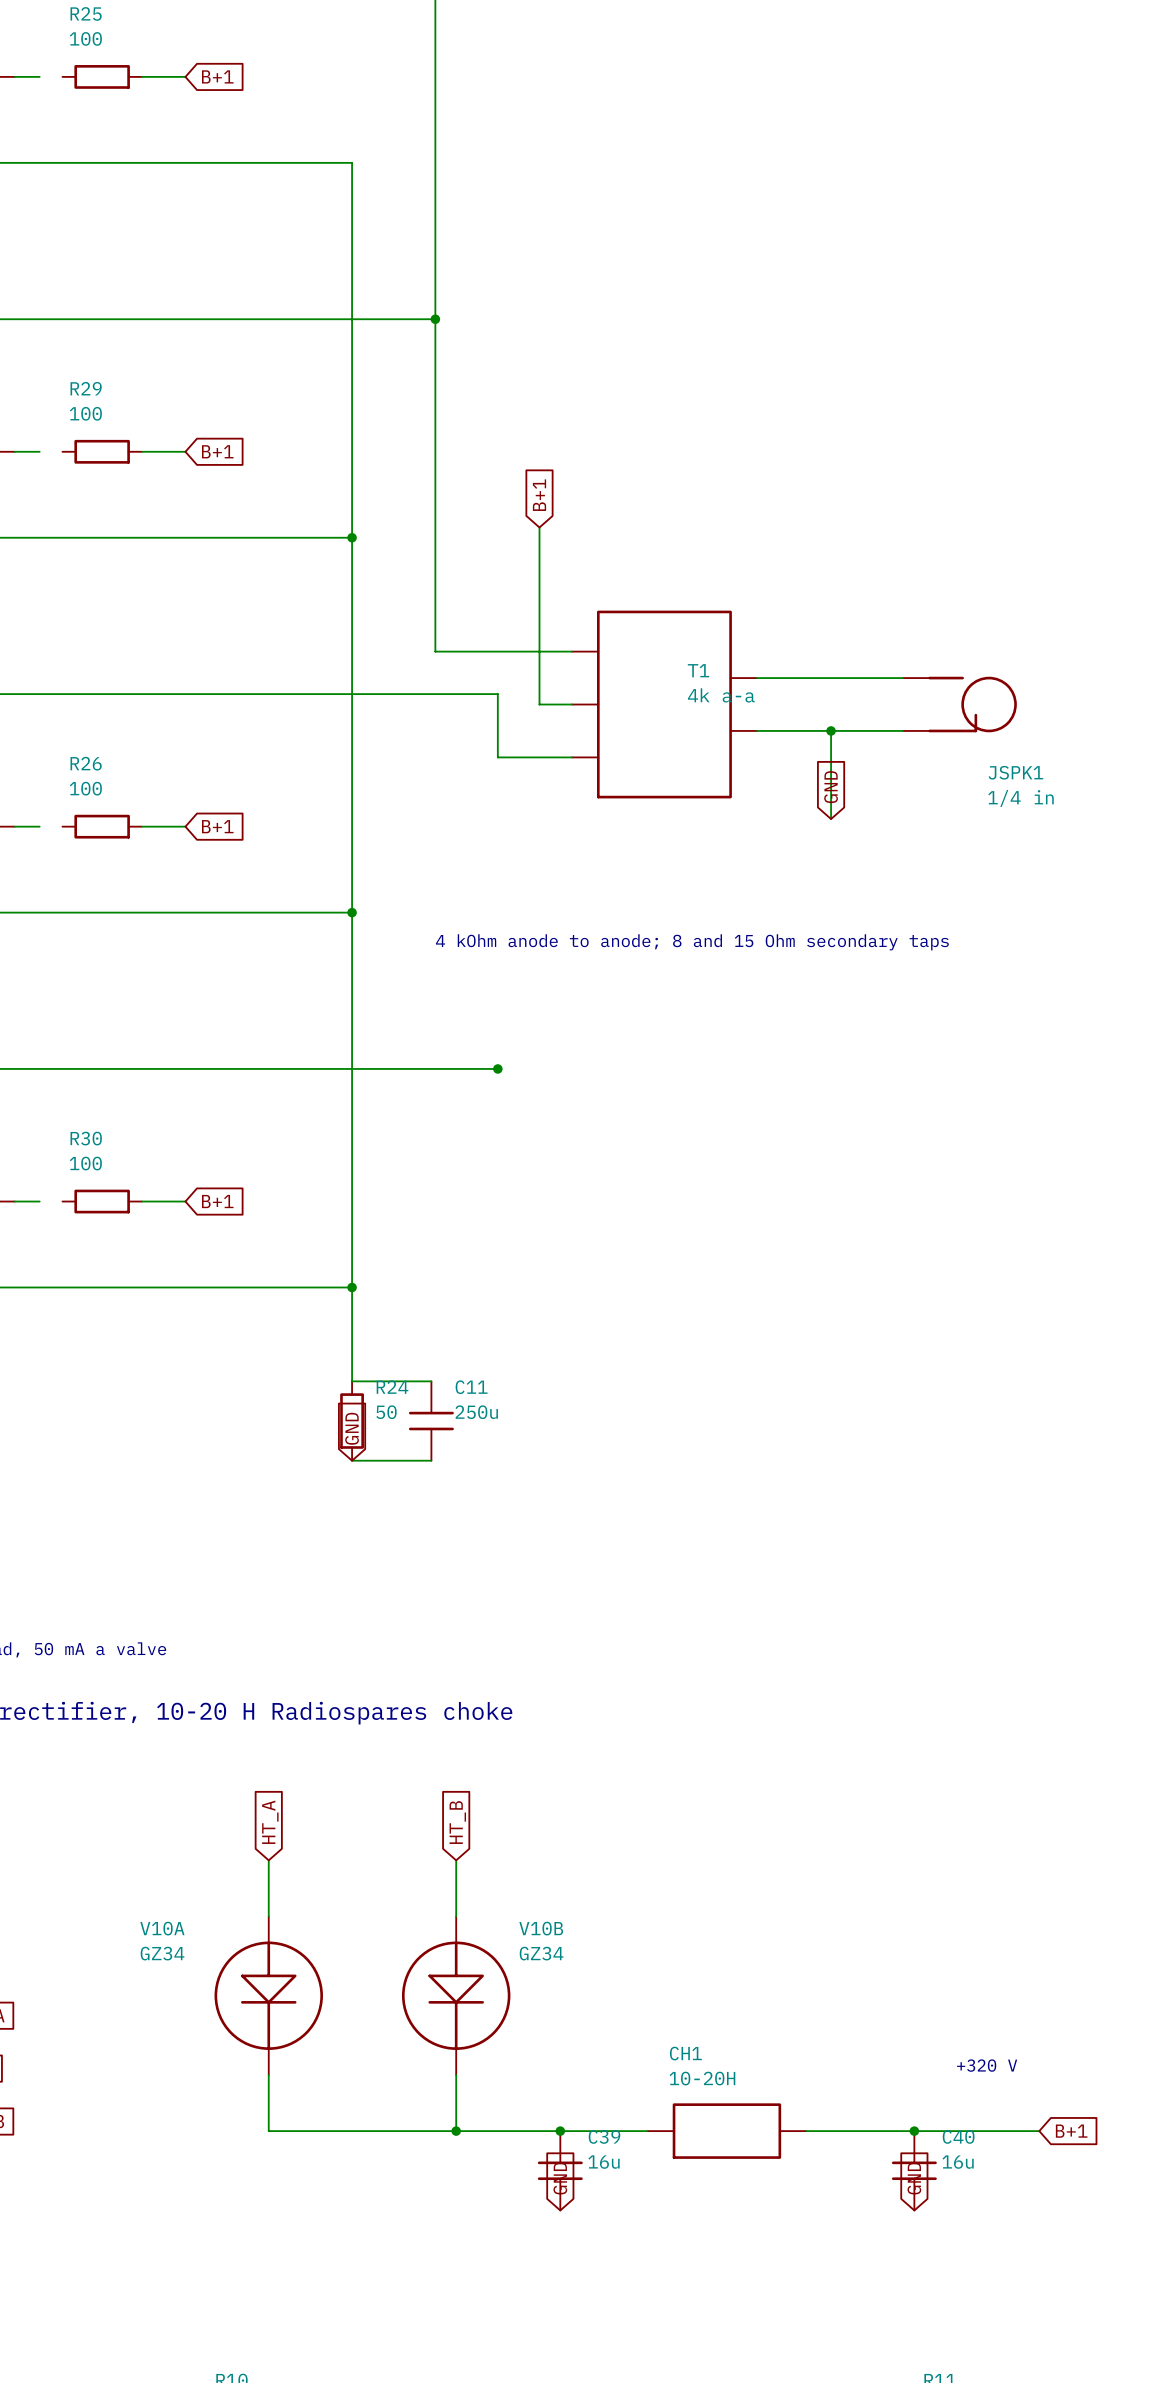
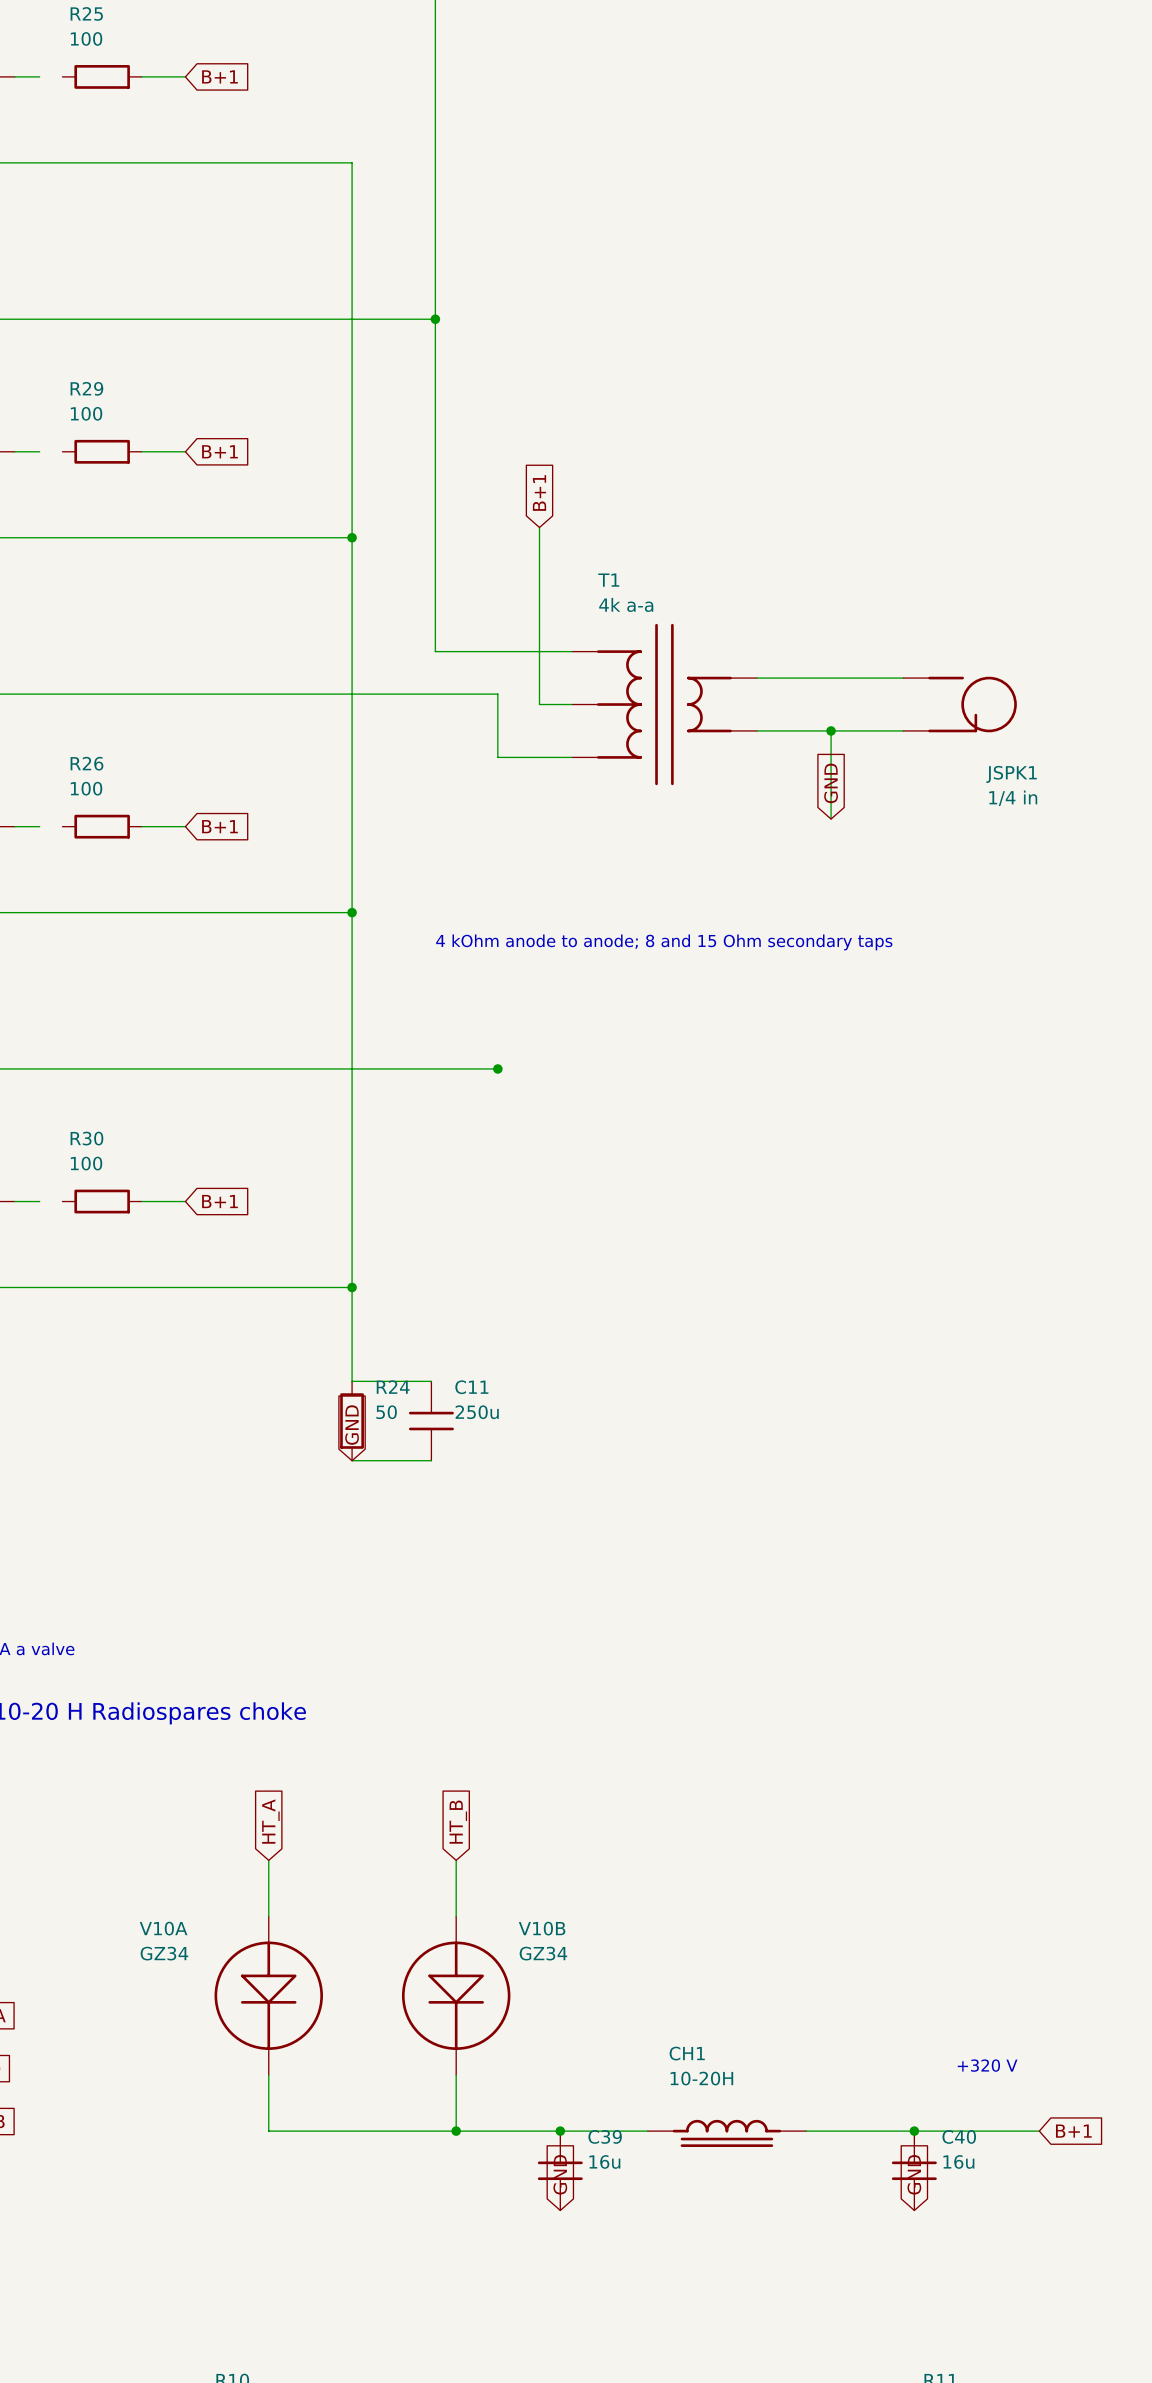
T1 symbol: [571, 610, 758, 799] -> [571, 623, 758, 786]
T1 name position: T1 (698, 670) -> T1 (608, 580)
T1 value position: 4k a-a (721, 695) -> 4k a-a (626, 604)
CH1 symbol: [647, 2103, 807, 2159] -> [647, 2119, 807, 2147]

